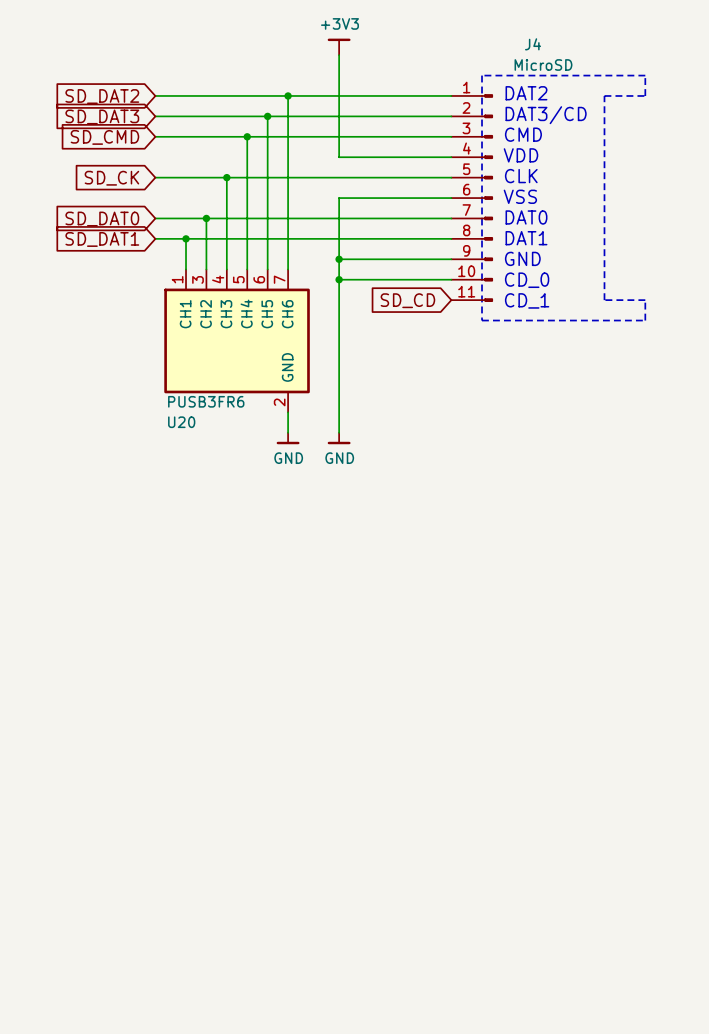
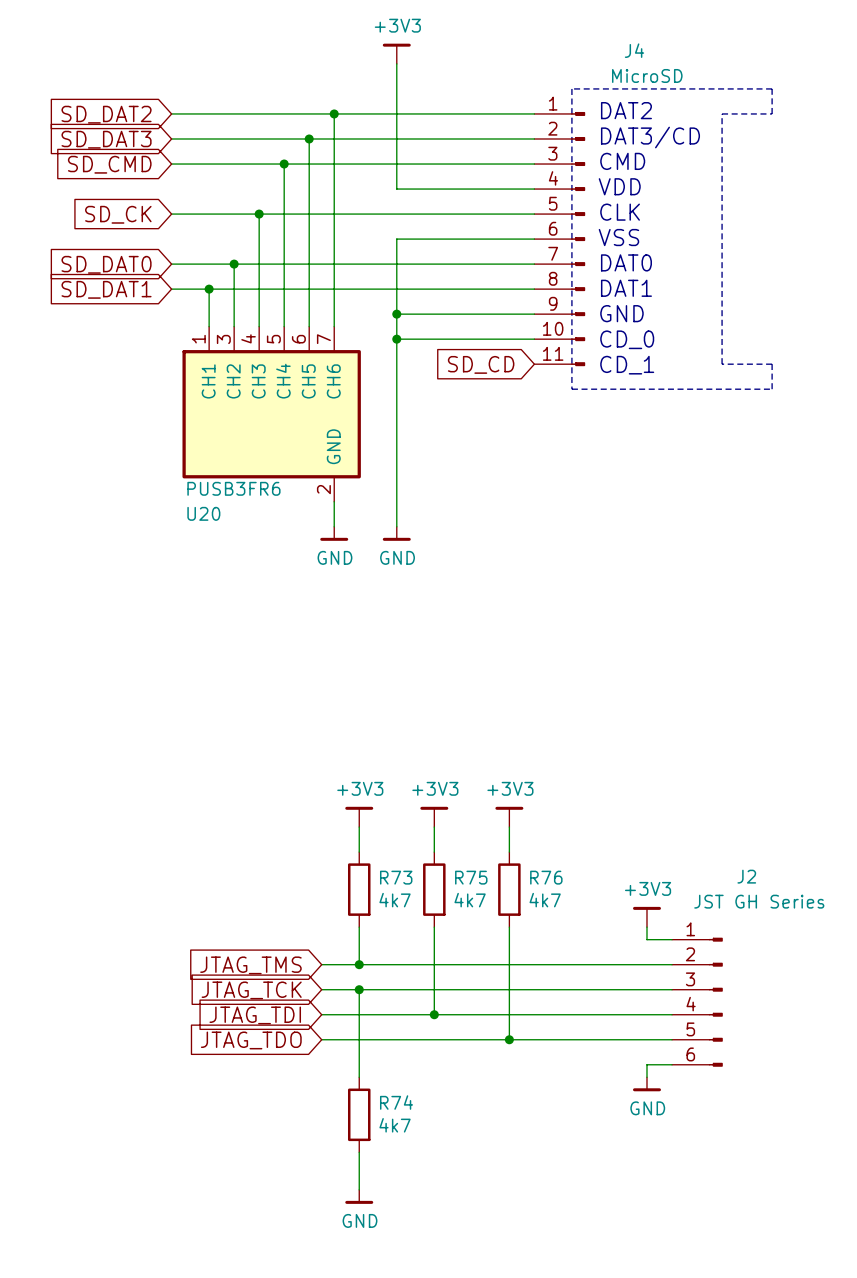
power symbol: none -> +3V3 (359, 816)
power symbol: none -> +3V3 (434, 816)
power symbol: none -> +3V3 (509, 816)
wire: none -> (359, 827) (359, 852)
wire: none -> (434, 827) (434, 852)
wire: none -> (509, 827) (509, 852)
R73: none -> 4k7 (359, 889)
R75: none -> 4k7 (434, 889)
R76: none -> 4k7 (509, 889)
power symbol: none -> +3V3 (646, 917)
wire: none -> (359, 927) (359, 964)
wire: none -> (434, 927) (434, 1014)
wire: none -> (509, 927) (509, 1039)
wire: none -> (646, 927) (646, 939) (672, 939)
global label: none -> JTAG_TMS (250, 965)
wire: none -> (321, 964) (672, 964)
junction: none -> (359, 964)
wire: none -> (321, 989) (672, 989)
wire: none -> (359, 989) (359, 1077)
junction: none -> (359, 989)
global label: none -> JTAG_TCK (251, 990)
J2: none -> JST GH Series (697, 1002)
wire: none -> (321, 1014) (672, 1014)
junction: none -> (434, 1014)
global label: none -> JTAG_TDI (255, 1015)
global label: none -> JTAG_TDO (251, 1040)
wire: none -> (321, 1039) (672, 1039)
junction: none -> (509, 1039)
wire: none -> (672, 1064) (646, 1064) (646, 1077)
power symbol: none -> GND (646, 1084)
R74: none -> 4k7 (359, 1114)
wire: none -> (359, 1152) (359, 1189)
power symbol: none -> GND (359, 1196)

